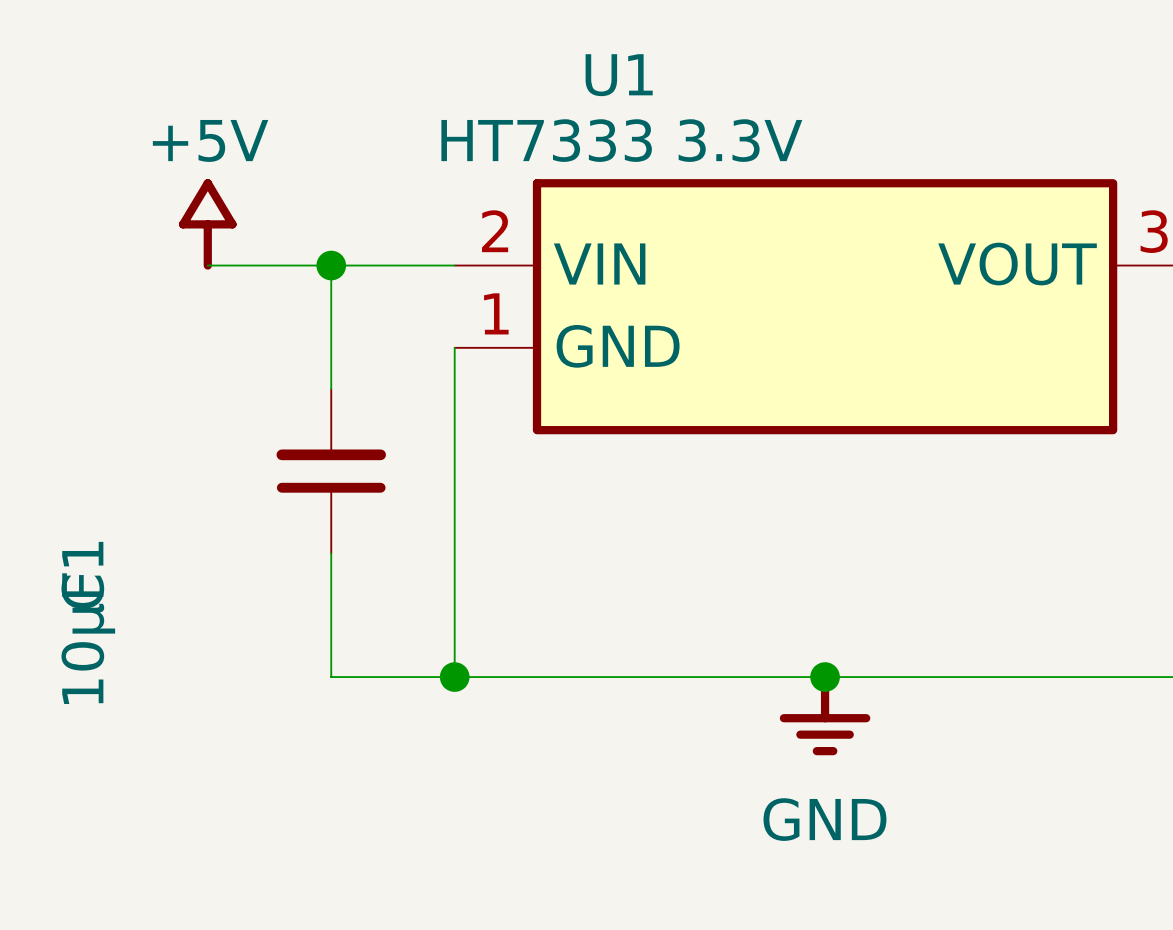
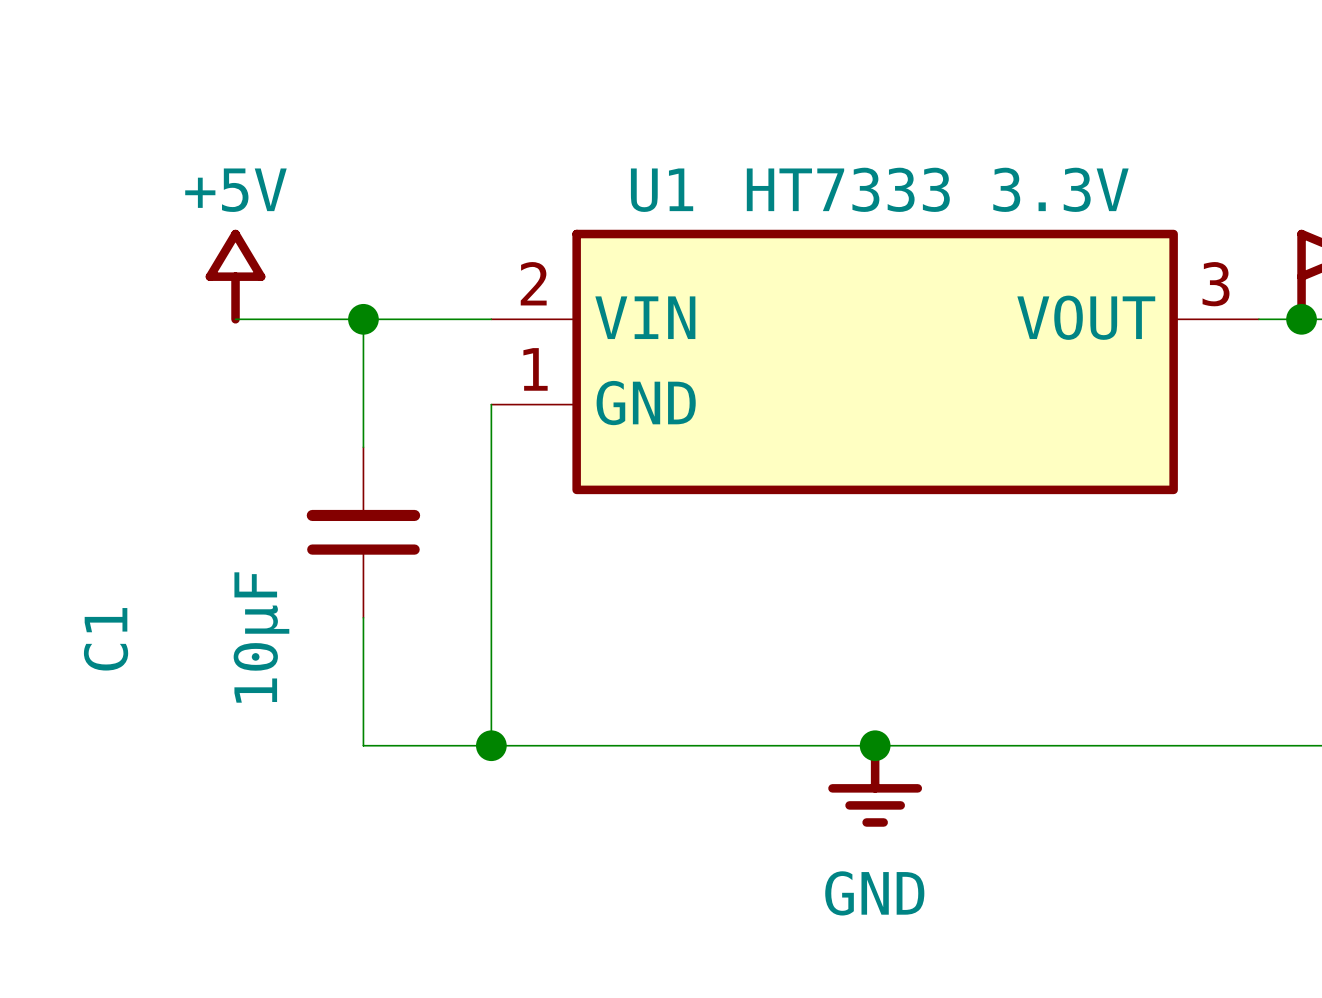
U1 name position: U1 (619, 75) -> U1 (662, 190)
U1 value position: HT7333 3.3V (621, 140) -> HT7333 3.3V (937, 189)
C1 value position: 10µF (88, 638) -> 10µF (261, 637)

